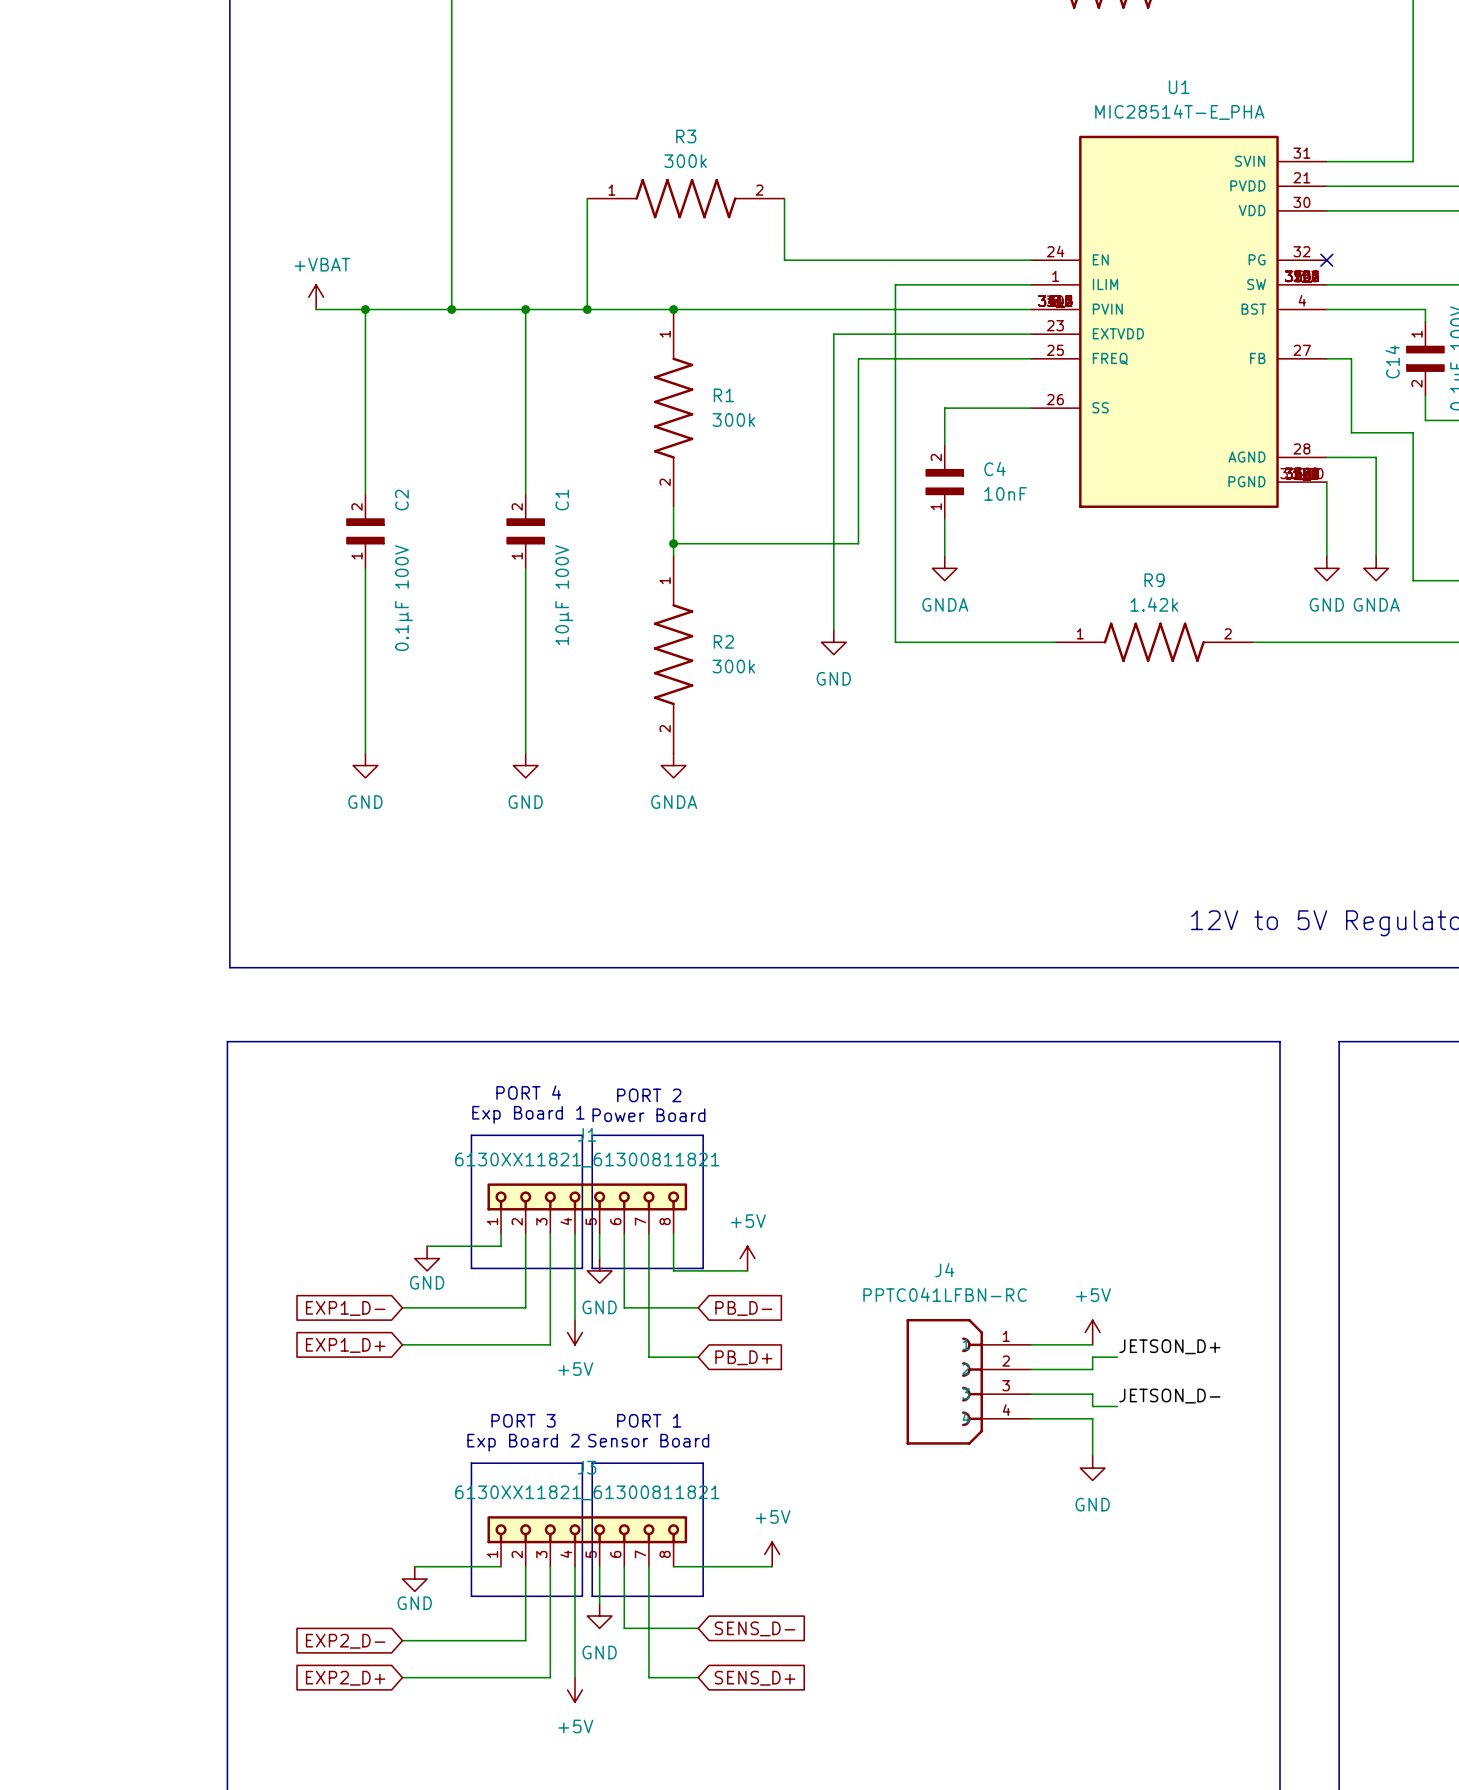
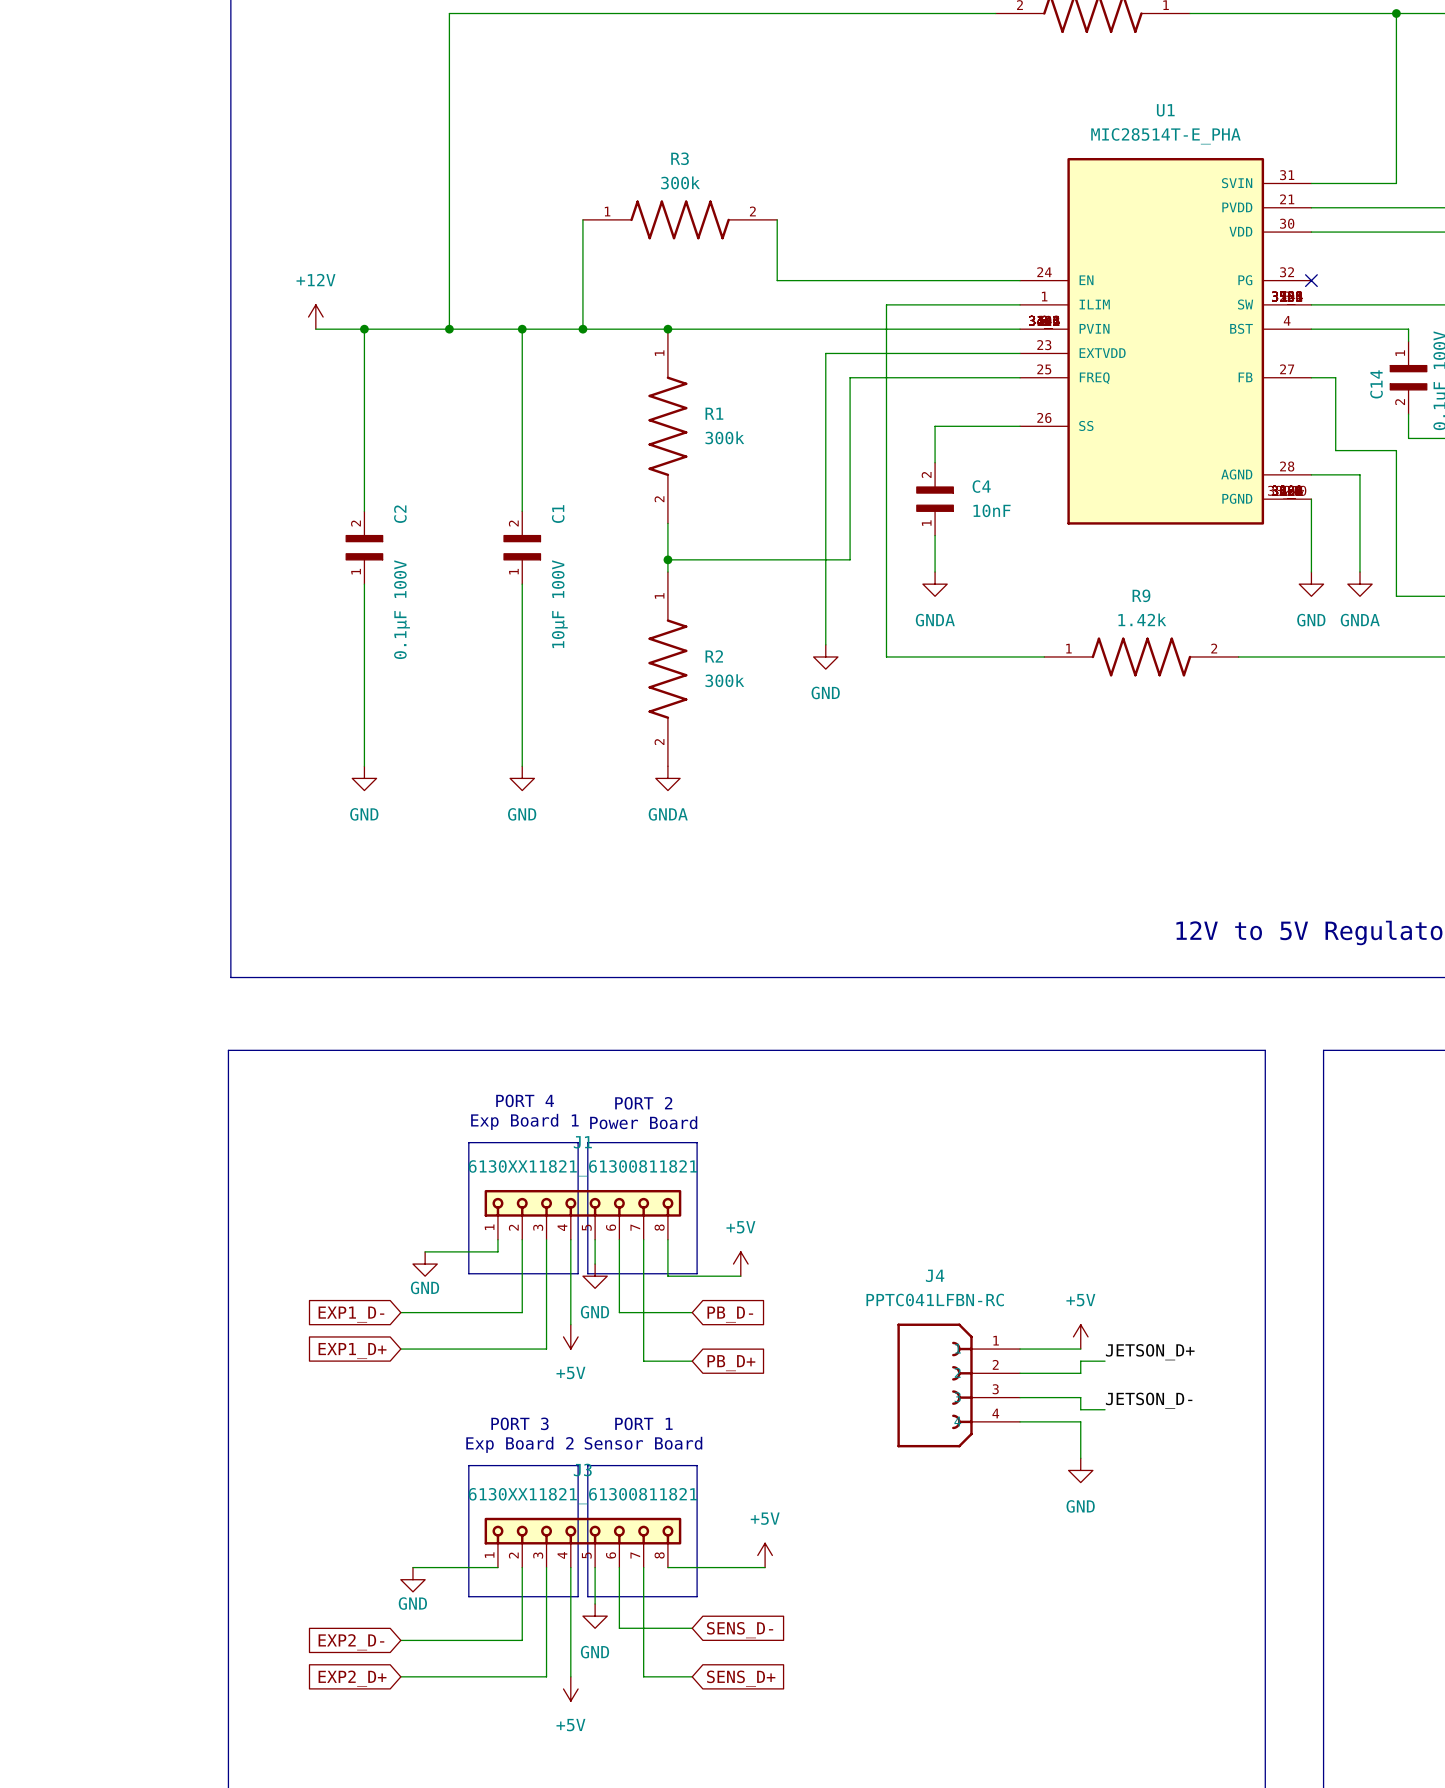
power symbol: +VBAT (316, 297) -> +12V (315, 317)

